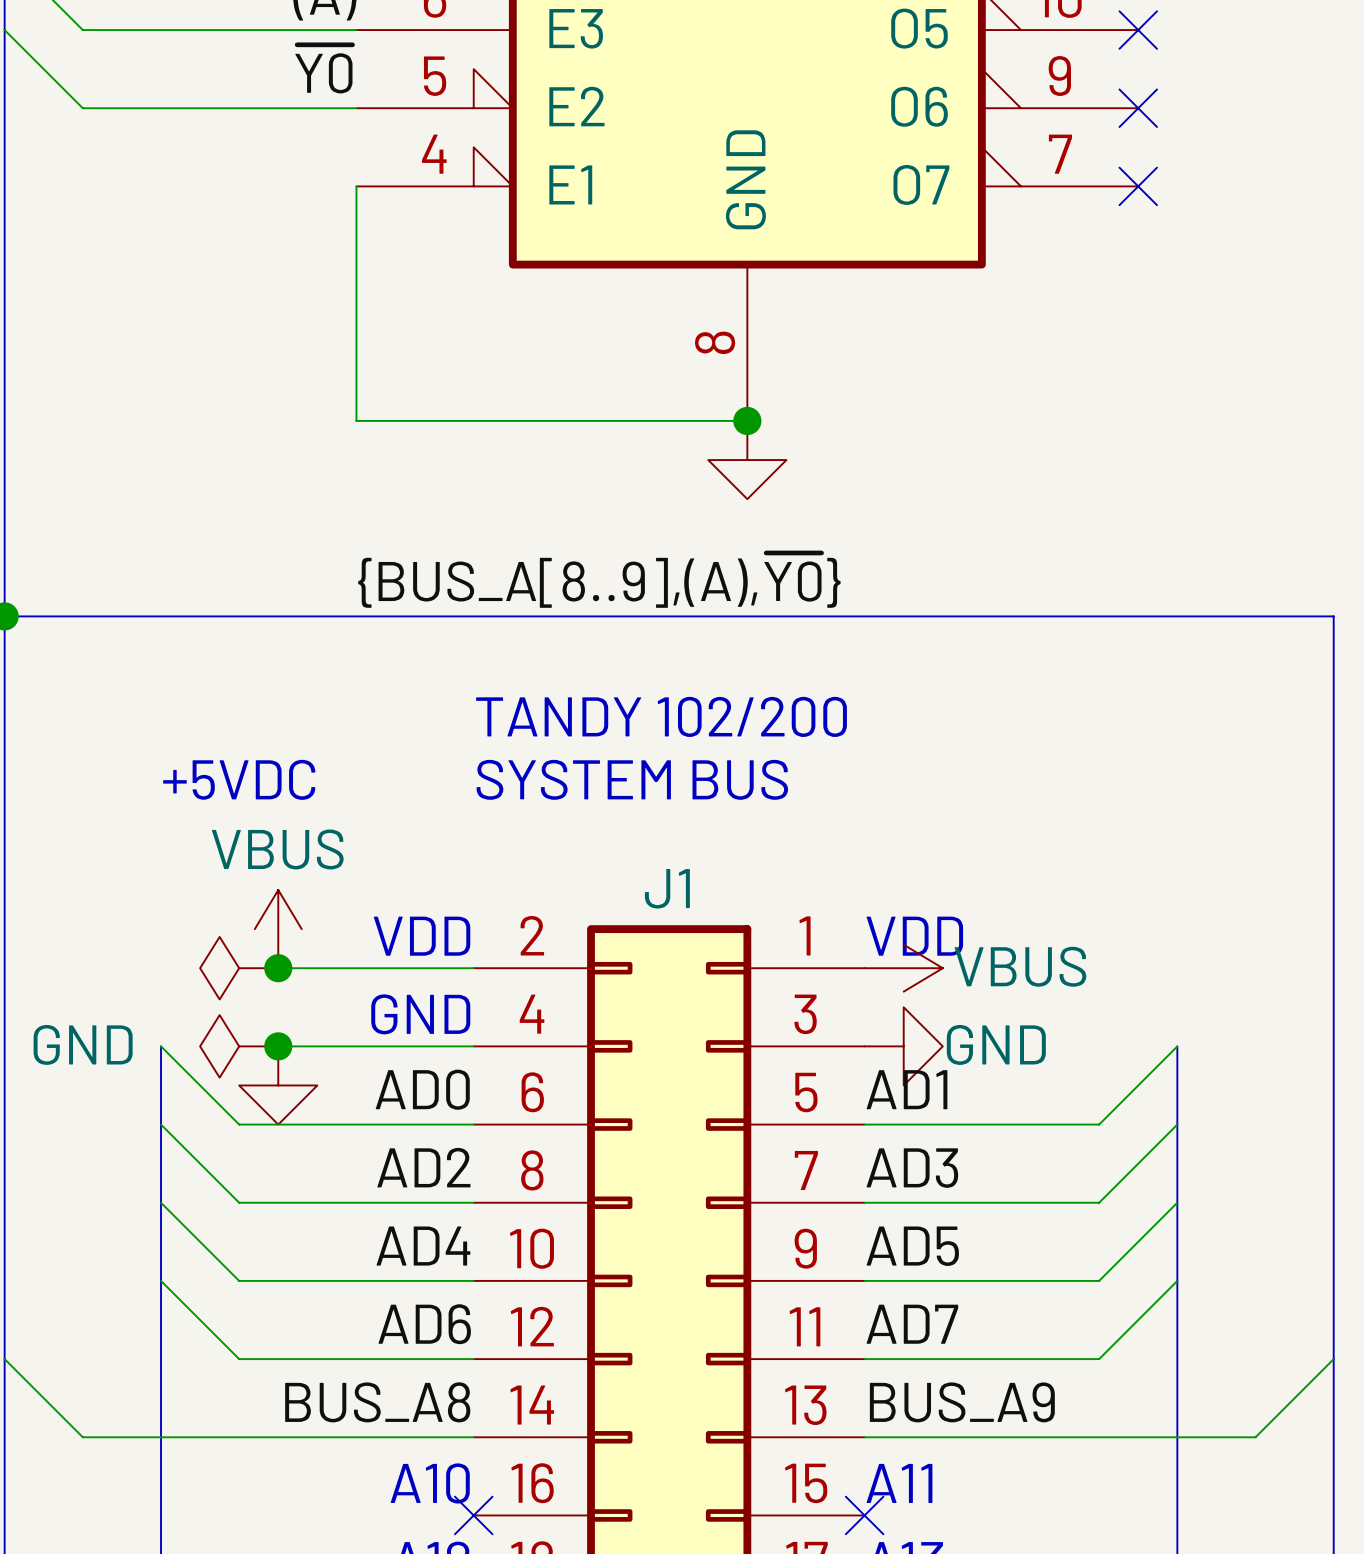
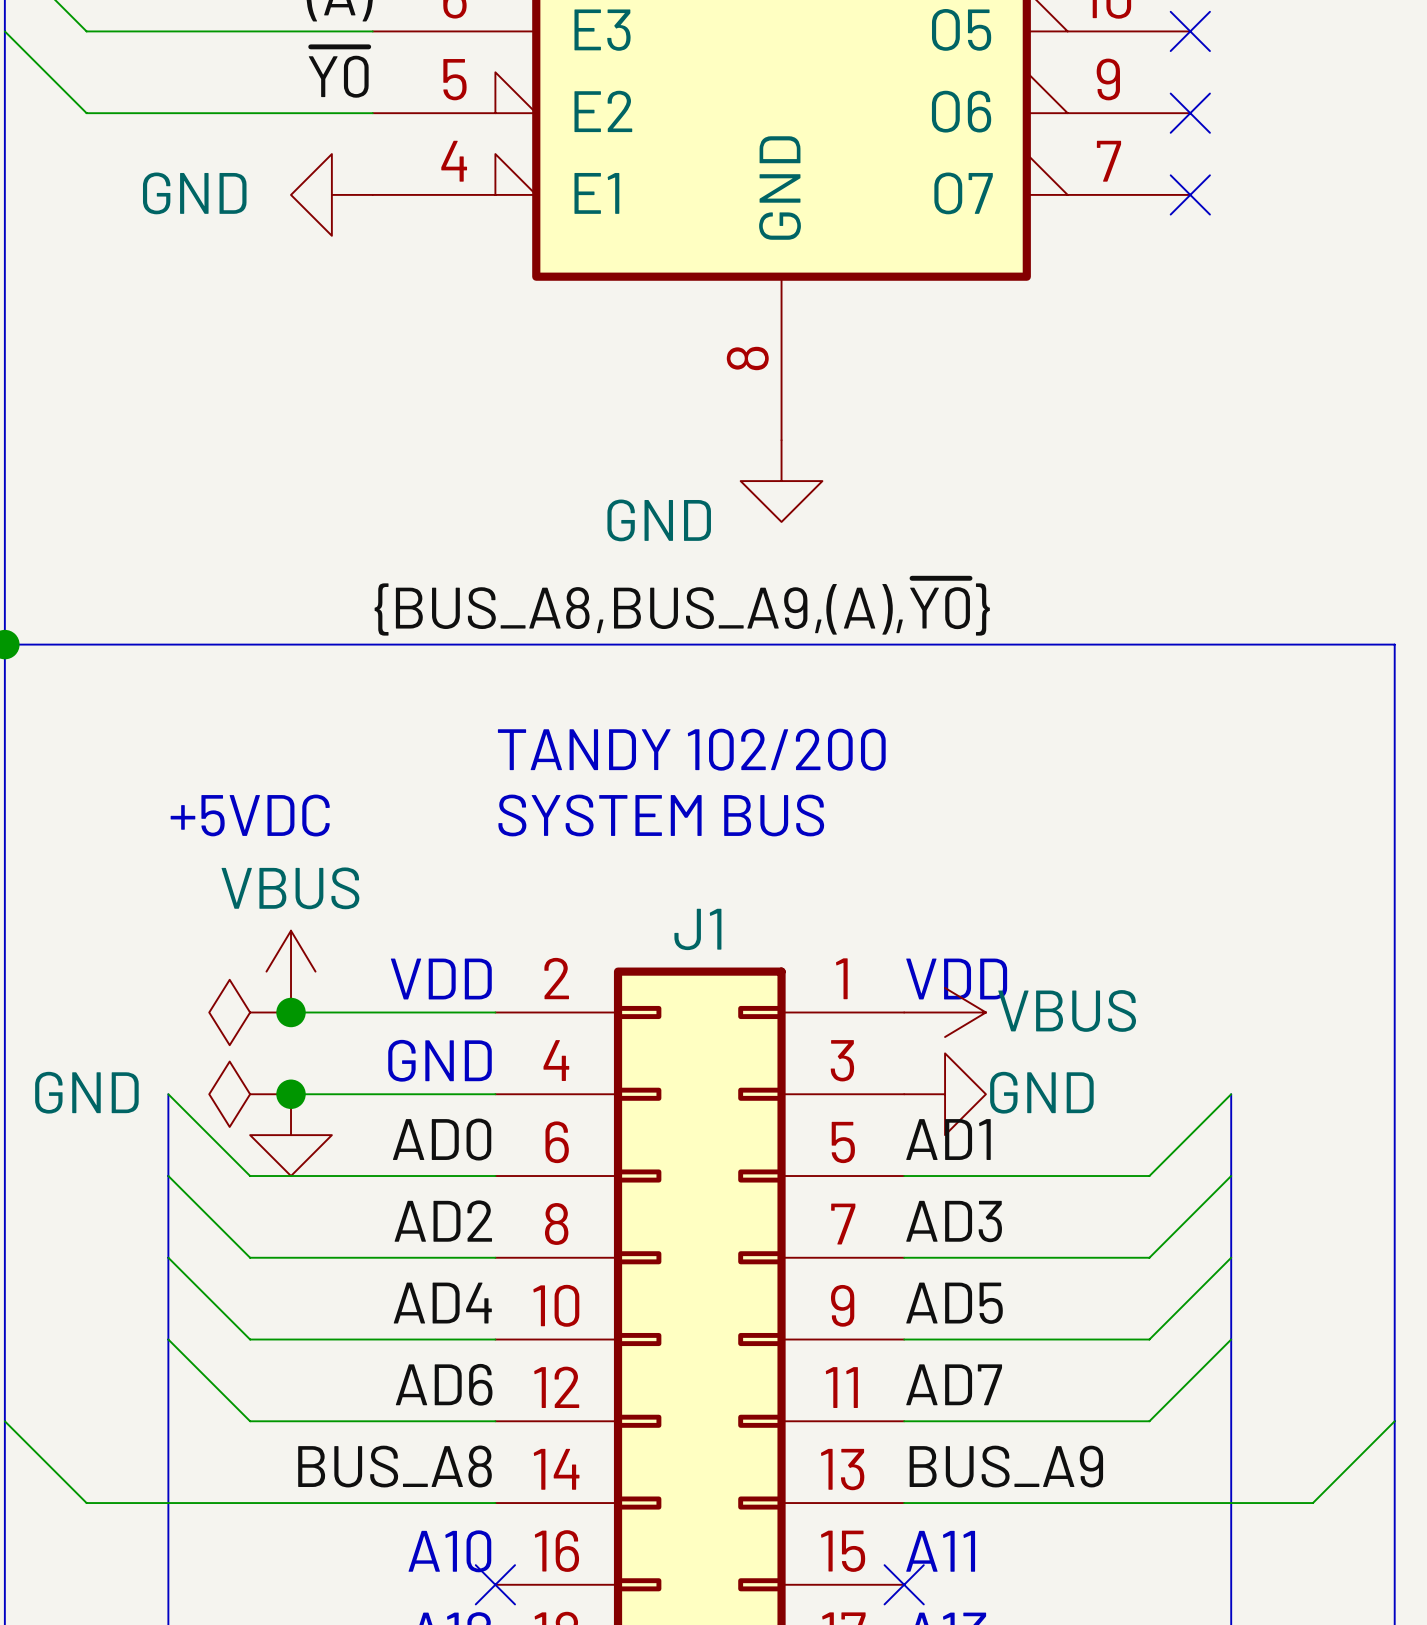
power symbol: none -> GND (331, 194)
wire: (356, 186) (356, 420) (747, 420) -> none
junction: (747, 420) -> none
power symbol text: none -> GND (659, 520)
label: {BUS_A[8..9],(A),~{Y0}} (599, 580) -> {BUS_A8,BUS_A9,(A),~{Y0}} (682, 606)

